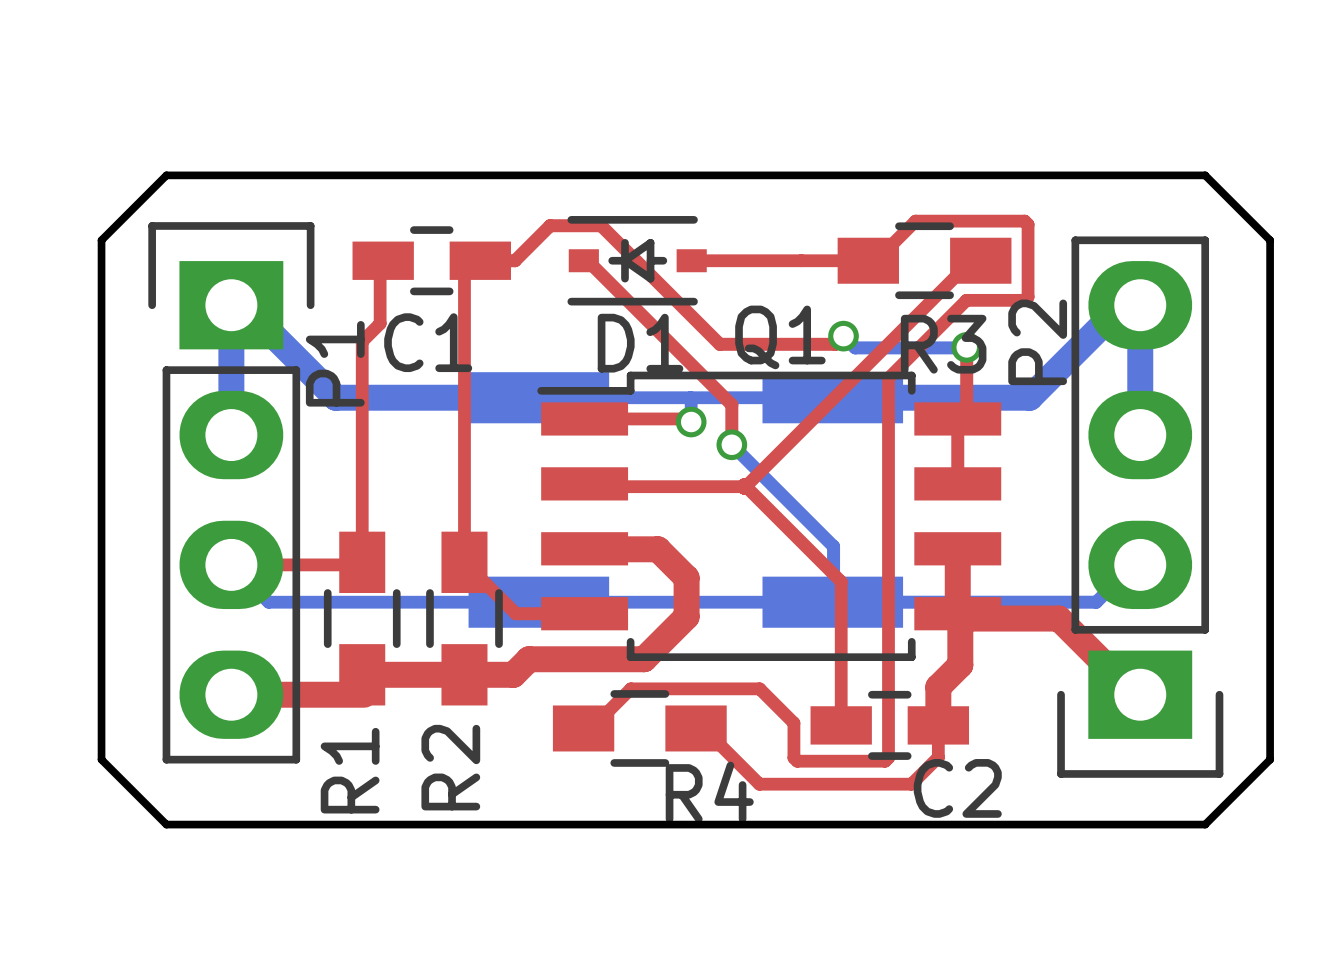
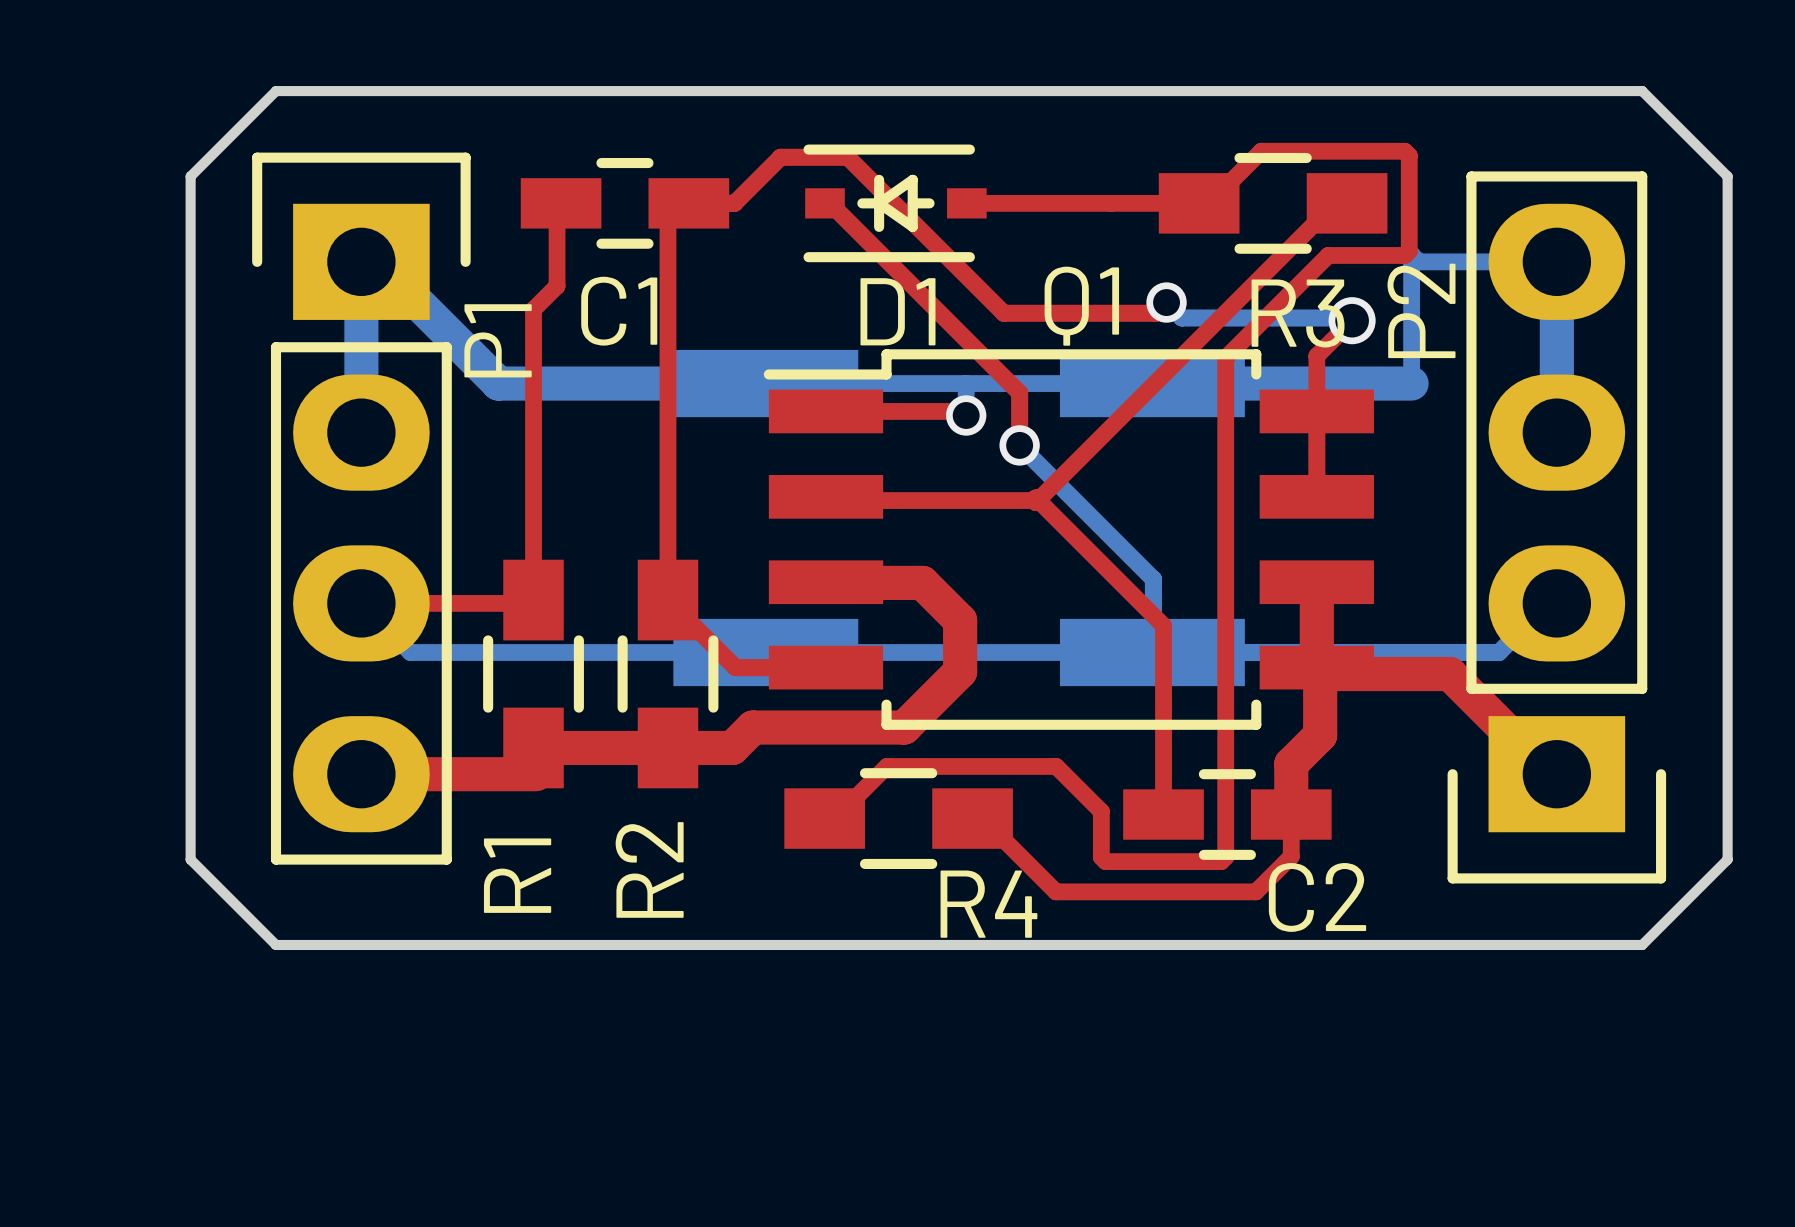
bottom track: (1120, 306) (1029, 397) -> (1556, 261) (1419, 261) (1411, 254) (1411, 383)
top track: (966, 347) (966, 416) -> none
via position: (966, 347) -> (1352, 320)
top track: none -> (1352, 320) (1316, 355) (1316, 411)

